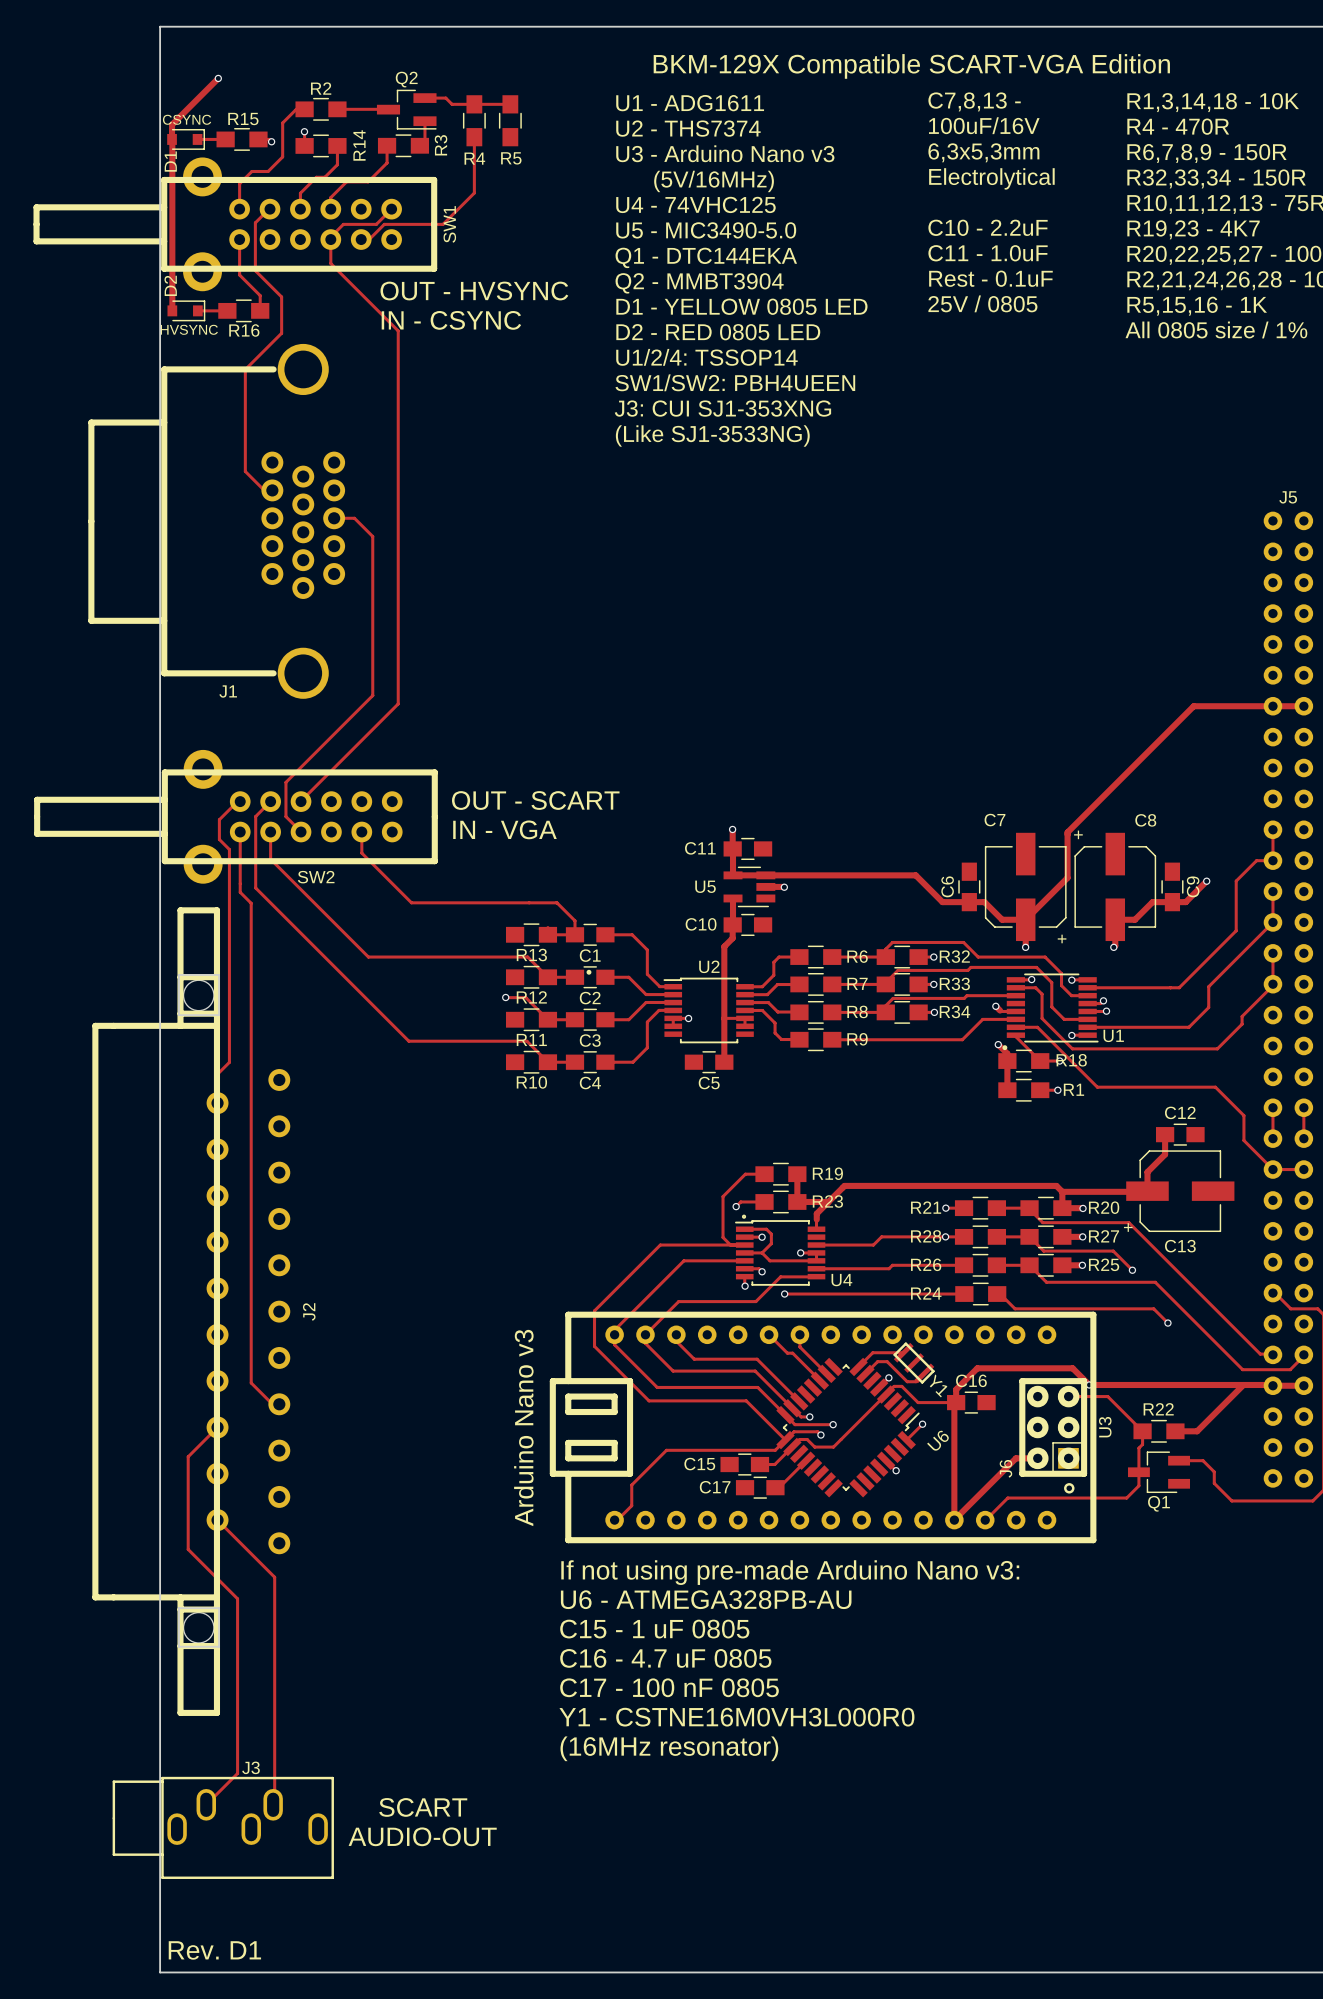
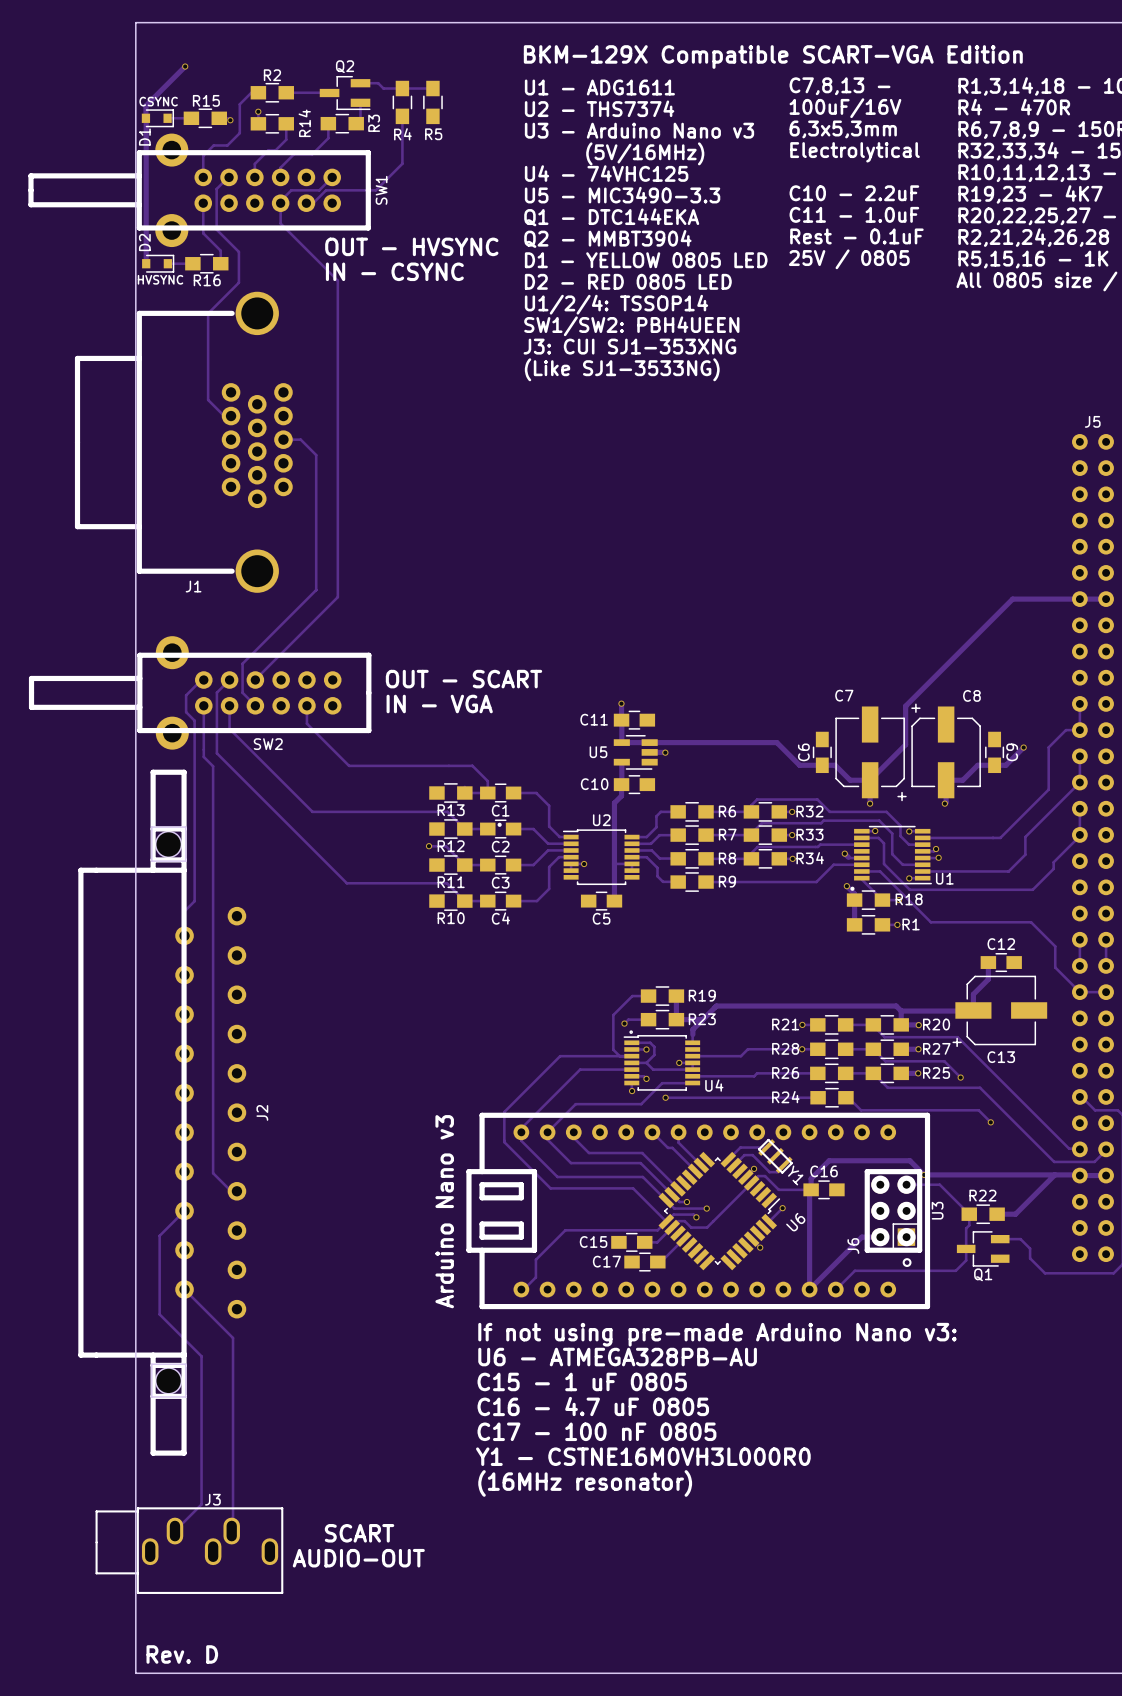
text: U5 - MIC3490-5.0 (706, 230) -> U5 - MIC3490-3.3 (622, 195)
text: Rev. D1 (214, 1950) -> Rev. D (182, 1654)

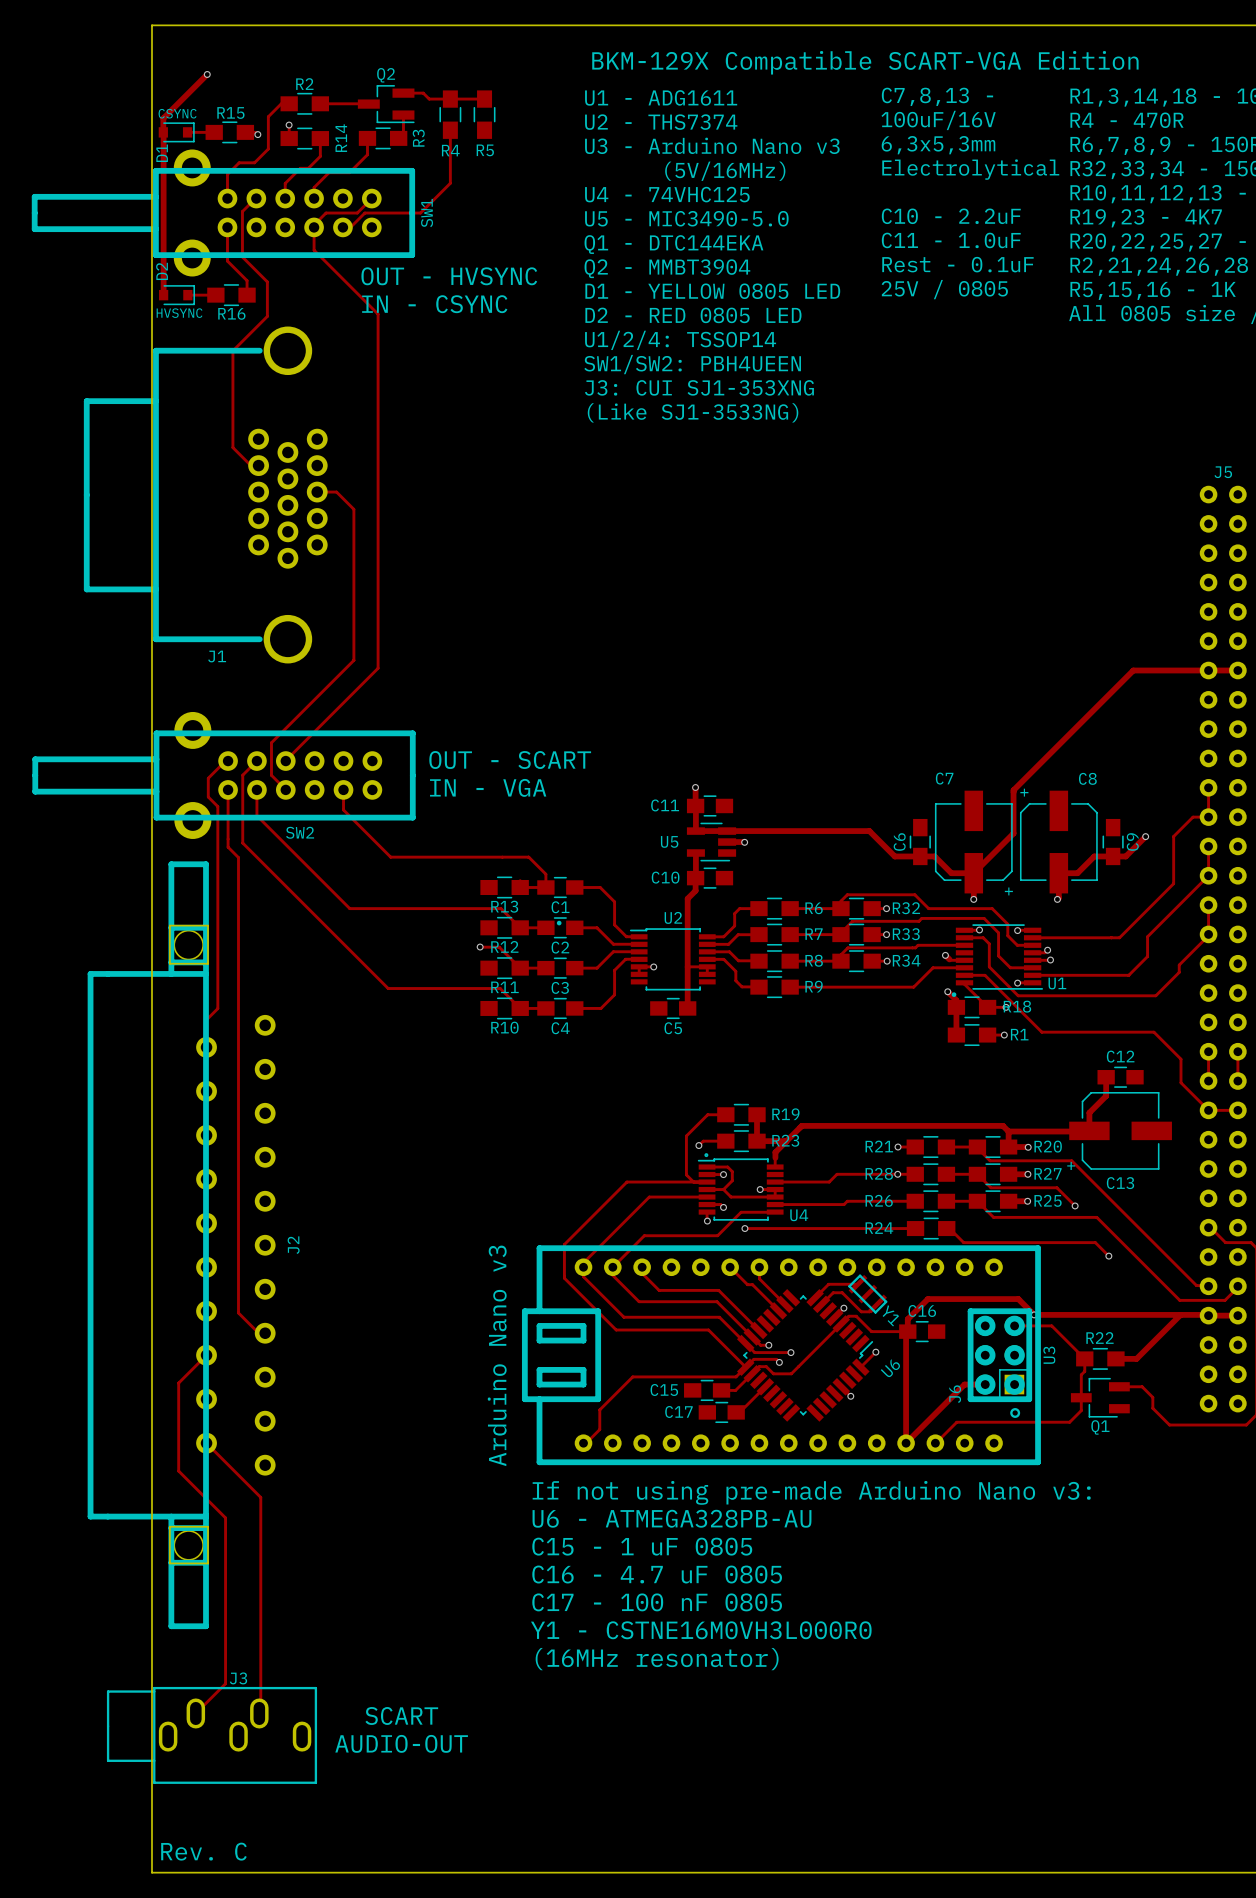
text: U5 - MIC3490-3.3 (622, 195) -> U5 - MIC3490-5.0 (686, 218)
text: Rev. D (182, 1654) -> Rev. C (203, 1851)

